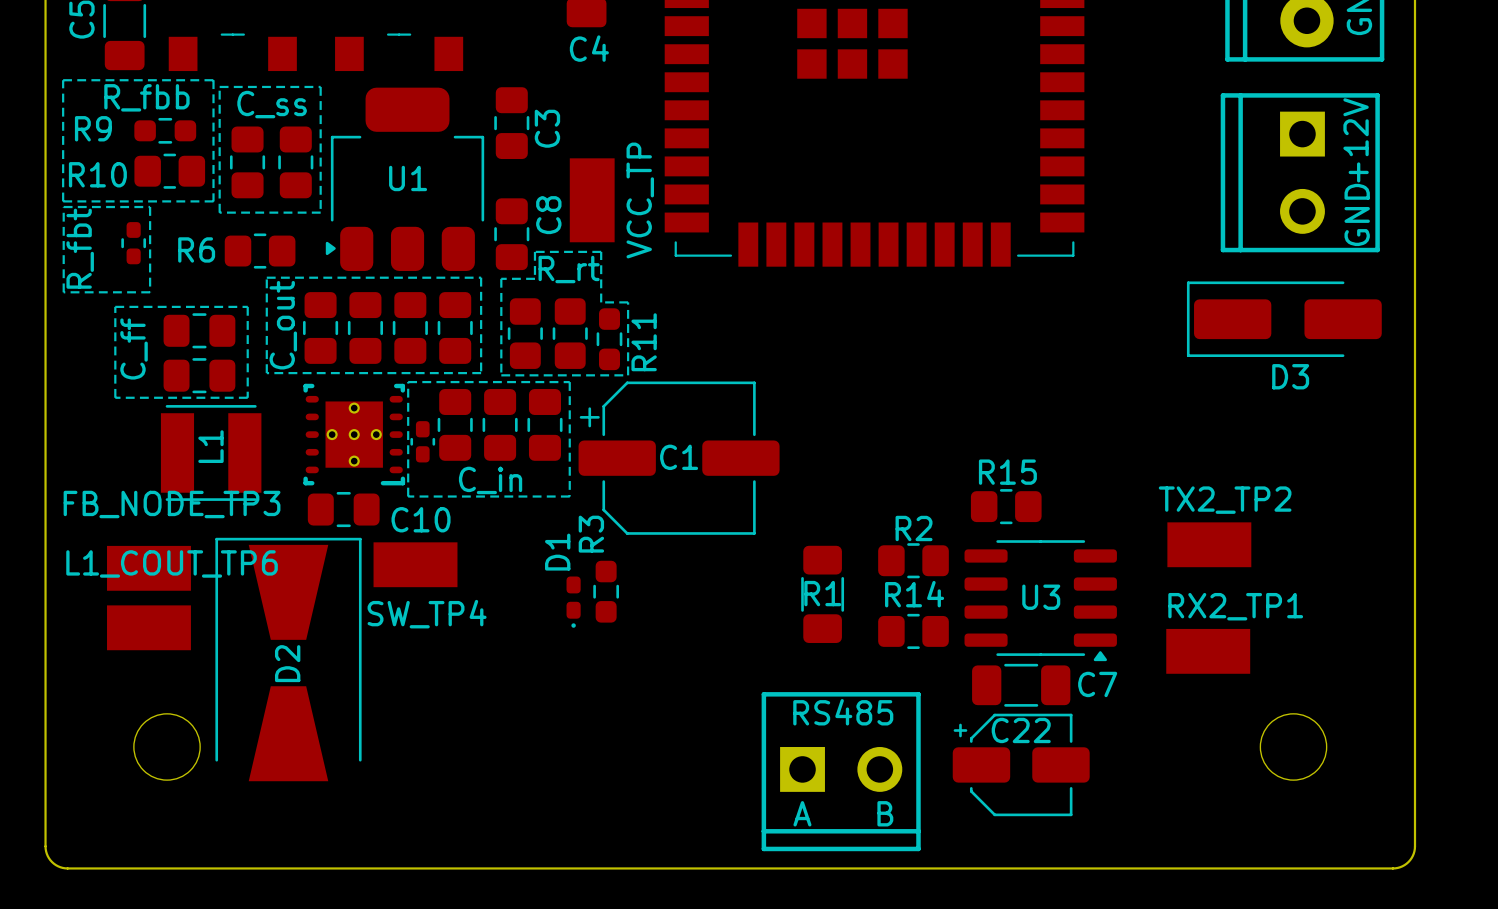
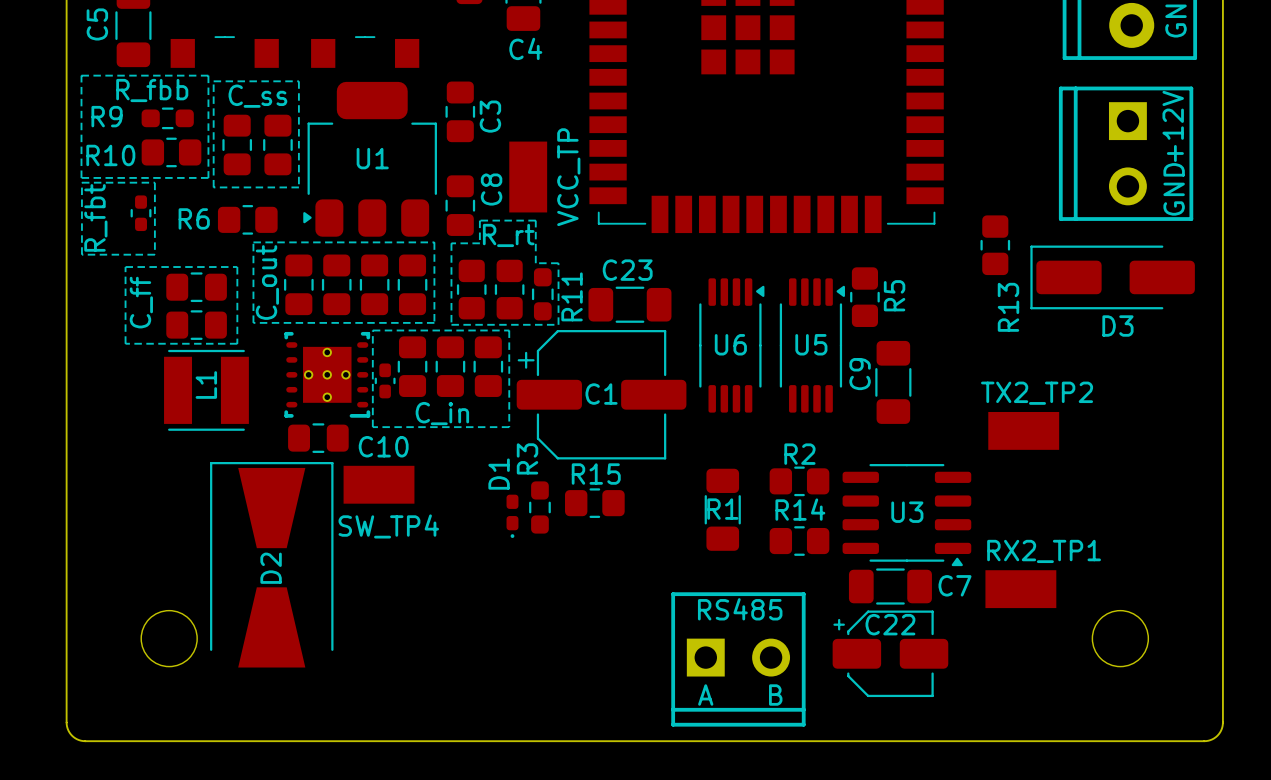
R13: none -> (995, 245)
R5: none -> (864, 297)
C23: none -> (629, 304)
U6: none -> (731, 345)
U5: none -> (812, 345)
C9: none -> (893, 382)
R15 position: (1006, 506) -> (594, 503)
TX2_TP2 position: (1209, 544) -> (1023, 430)
FB_NODE_TP3: (148, 568) -> none
L1_COUT_TP6: (148, 627) -> none
RX2_TP1 position: (1208, 651) -> (1020, 589)

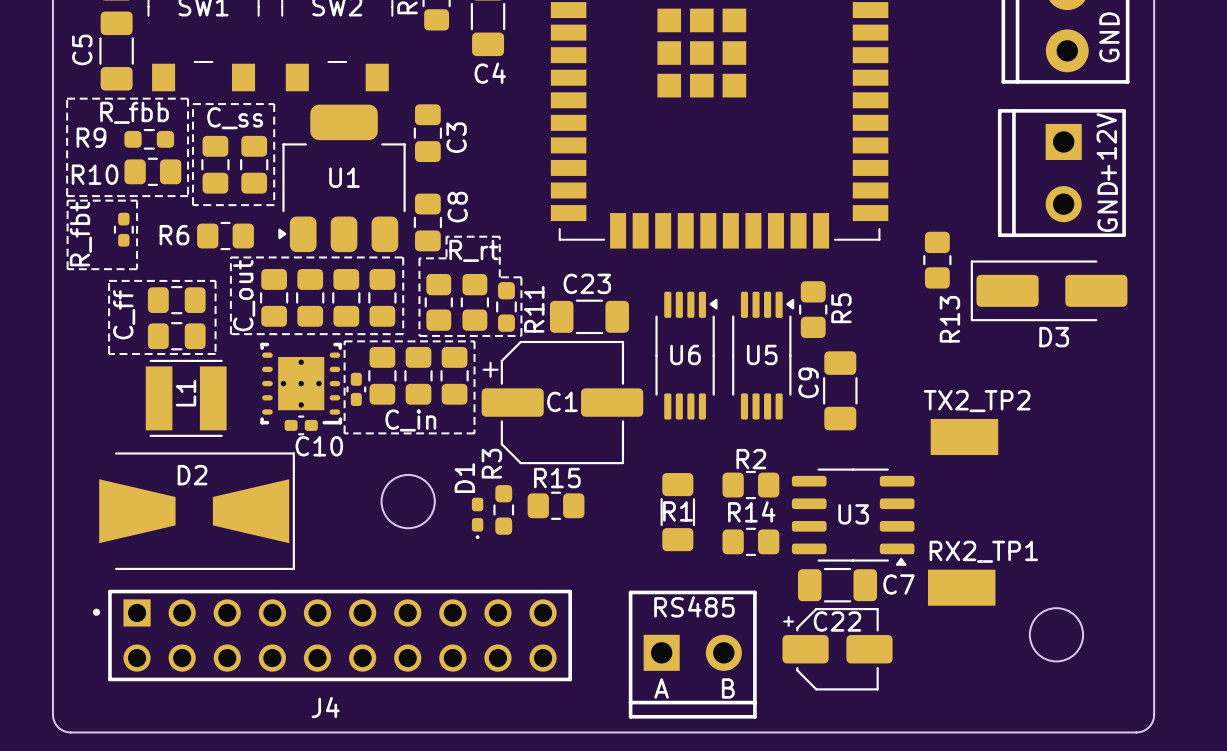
part: (528, 177) -> none
text: VCC_TP (568, 177) -> none
C10 footprint: [288, 423, 349, 453] -> [284, 415, 318, 436]
C10 name position: C10 (383, 446) -> C10 (319, 446)
SW_TP4: (379, 484) -> none
D2 rotation: 0° (271, 564) -> 90° clockwise (197, 511)
round board edge position: (169, 638) -> (408, 501)
J4: none -> (332, 635)

